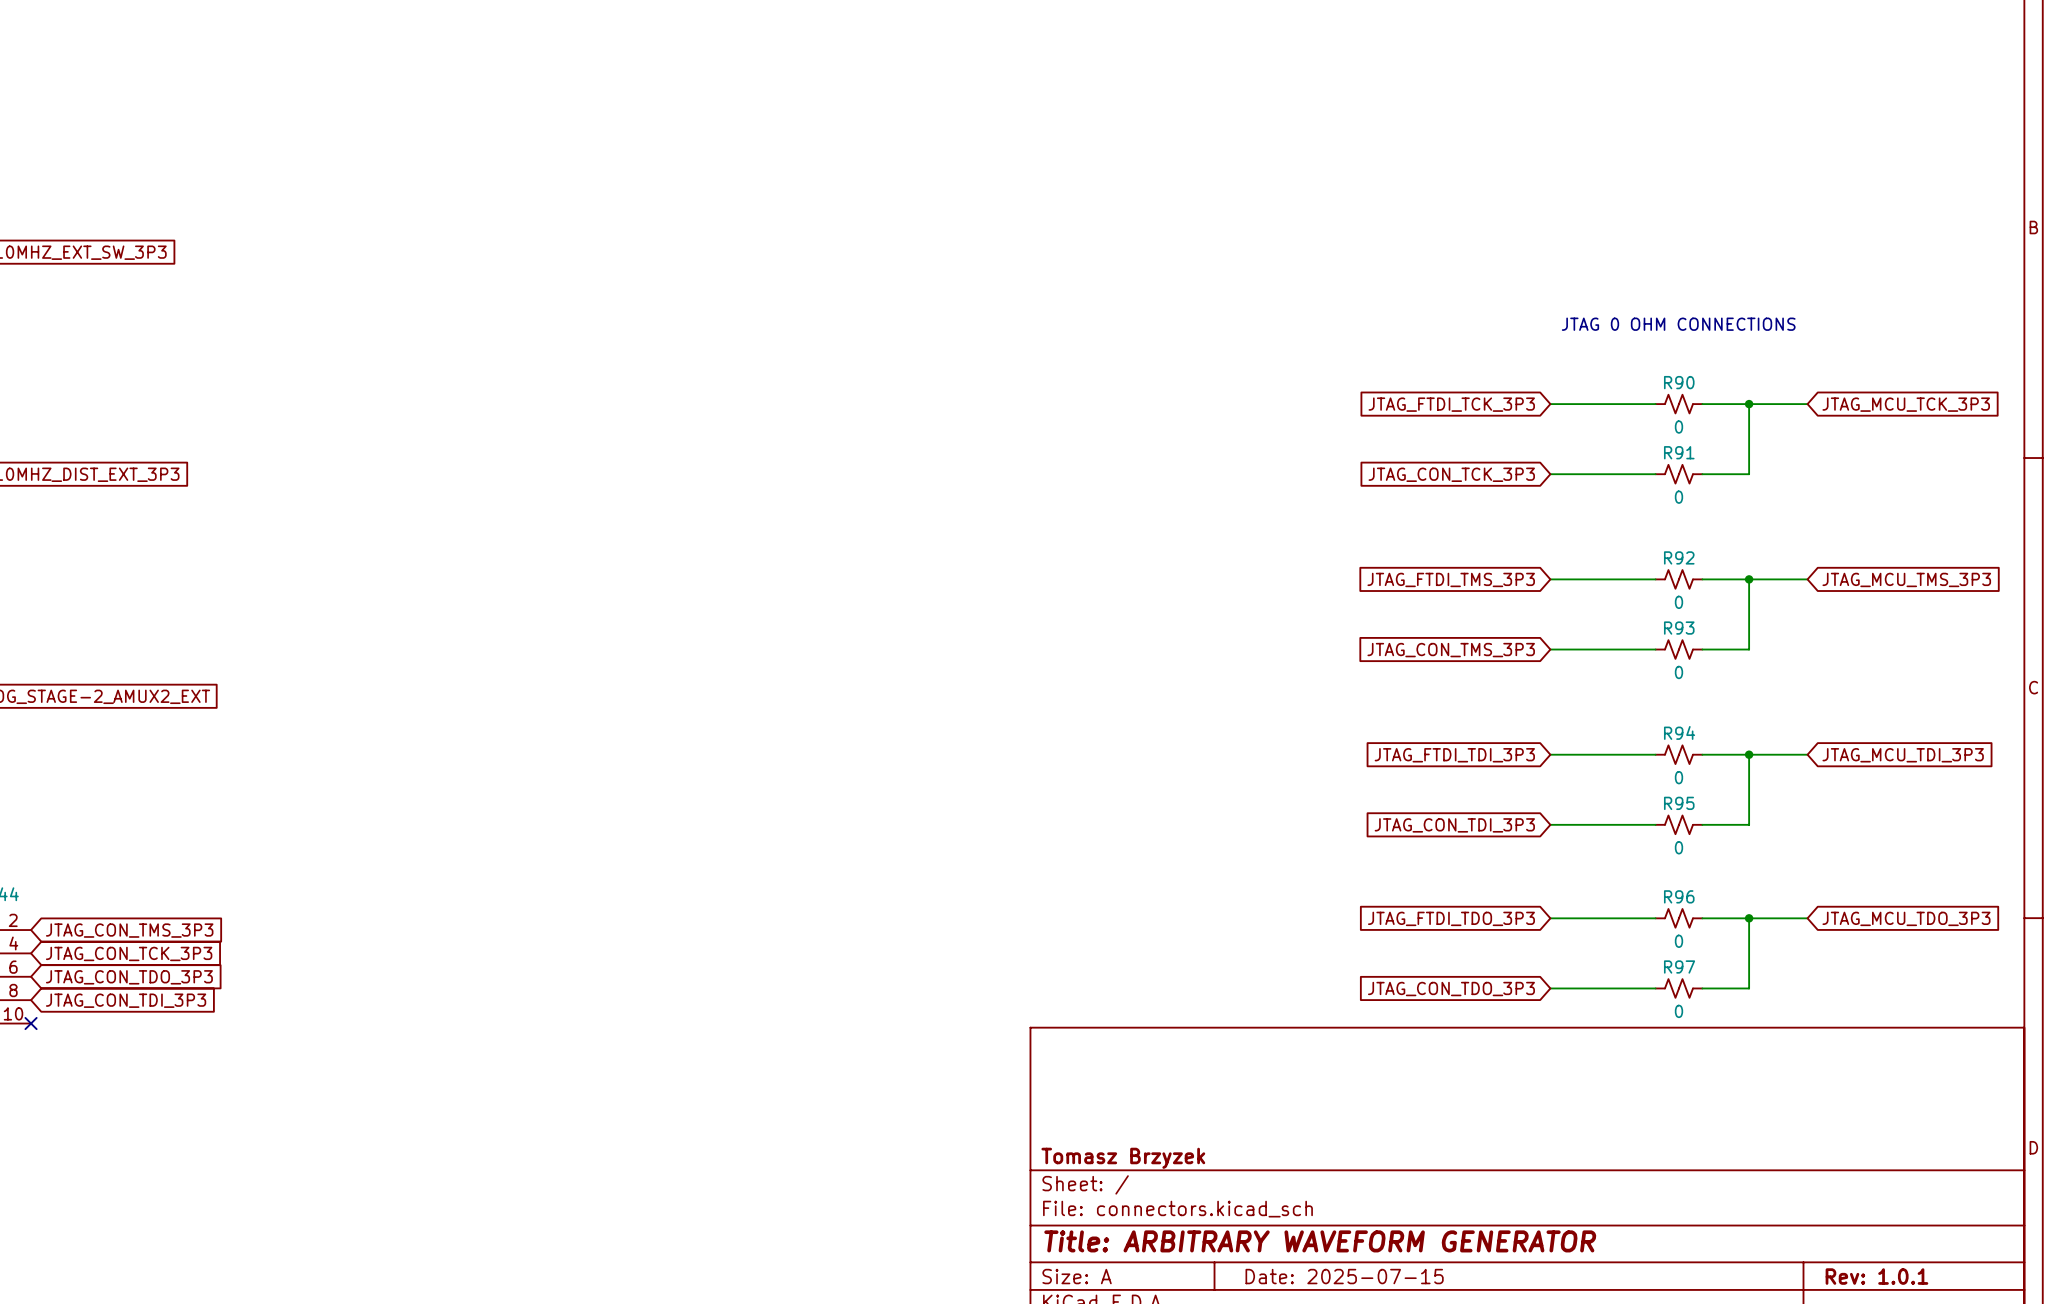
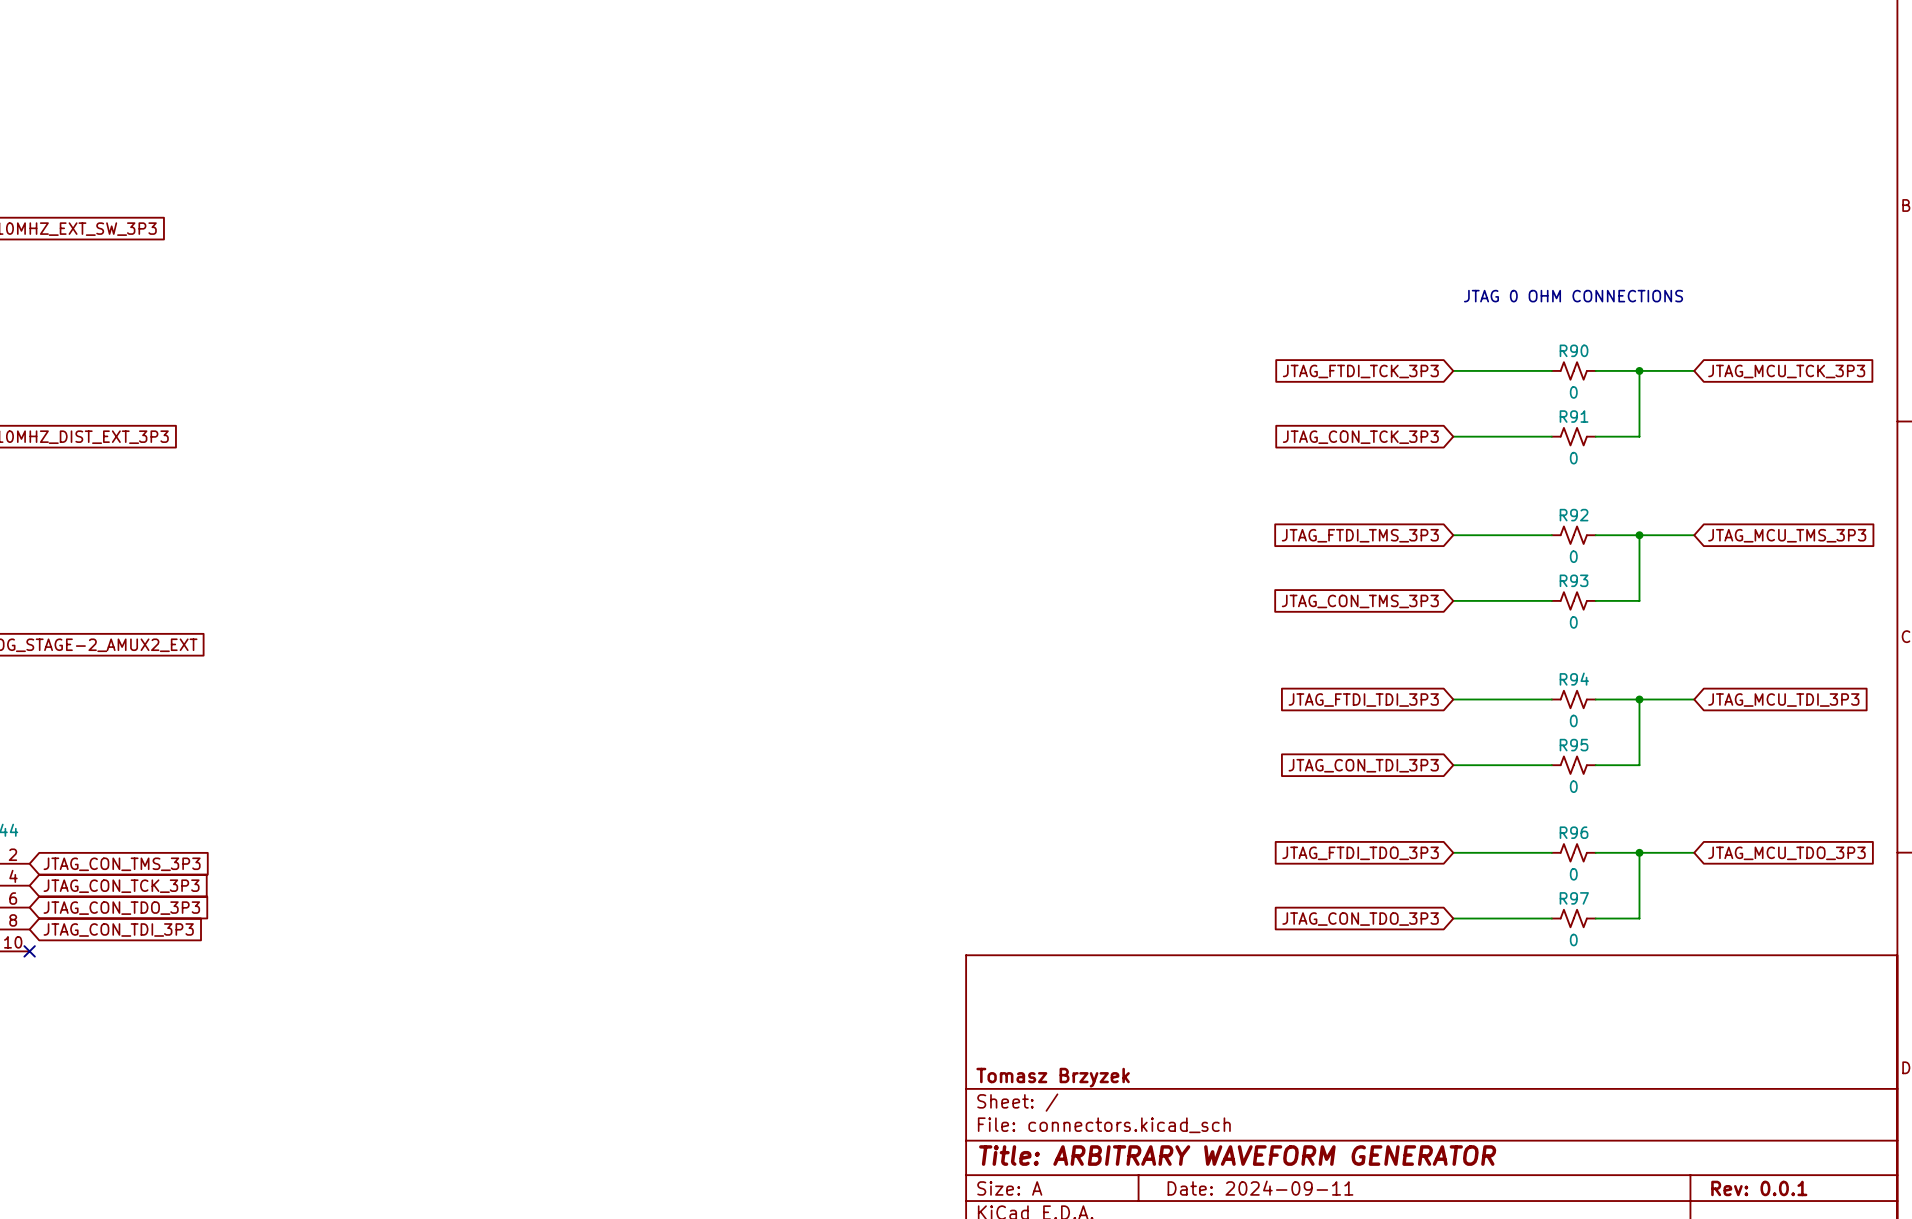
title block: Date: 2025-07-15 (1344, 1276) -> Date: 2024-09-11 (1260, 1188)
title block: Rev: 1.0.1 (1876, 1276) -> Rev: 0.0.1 (1759, 1188)

